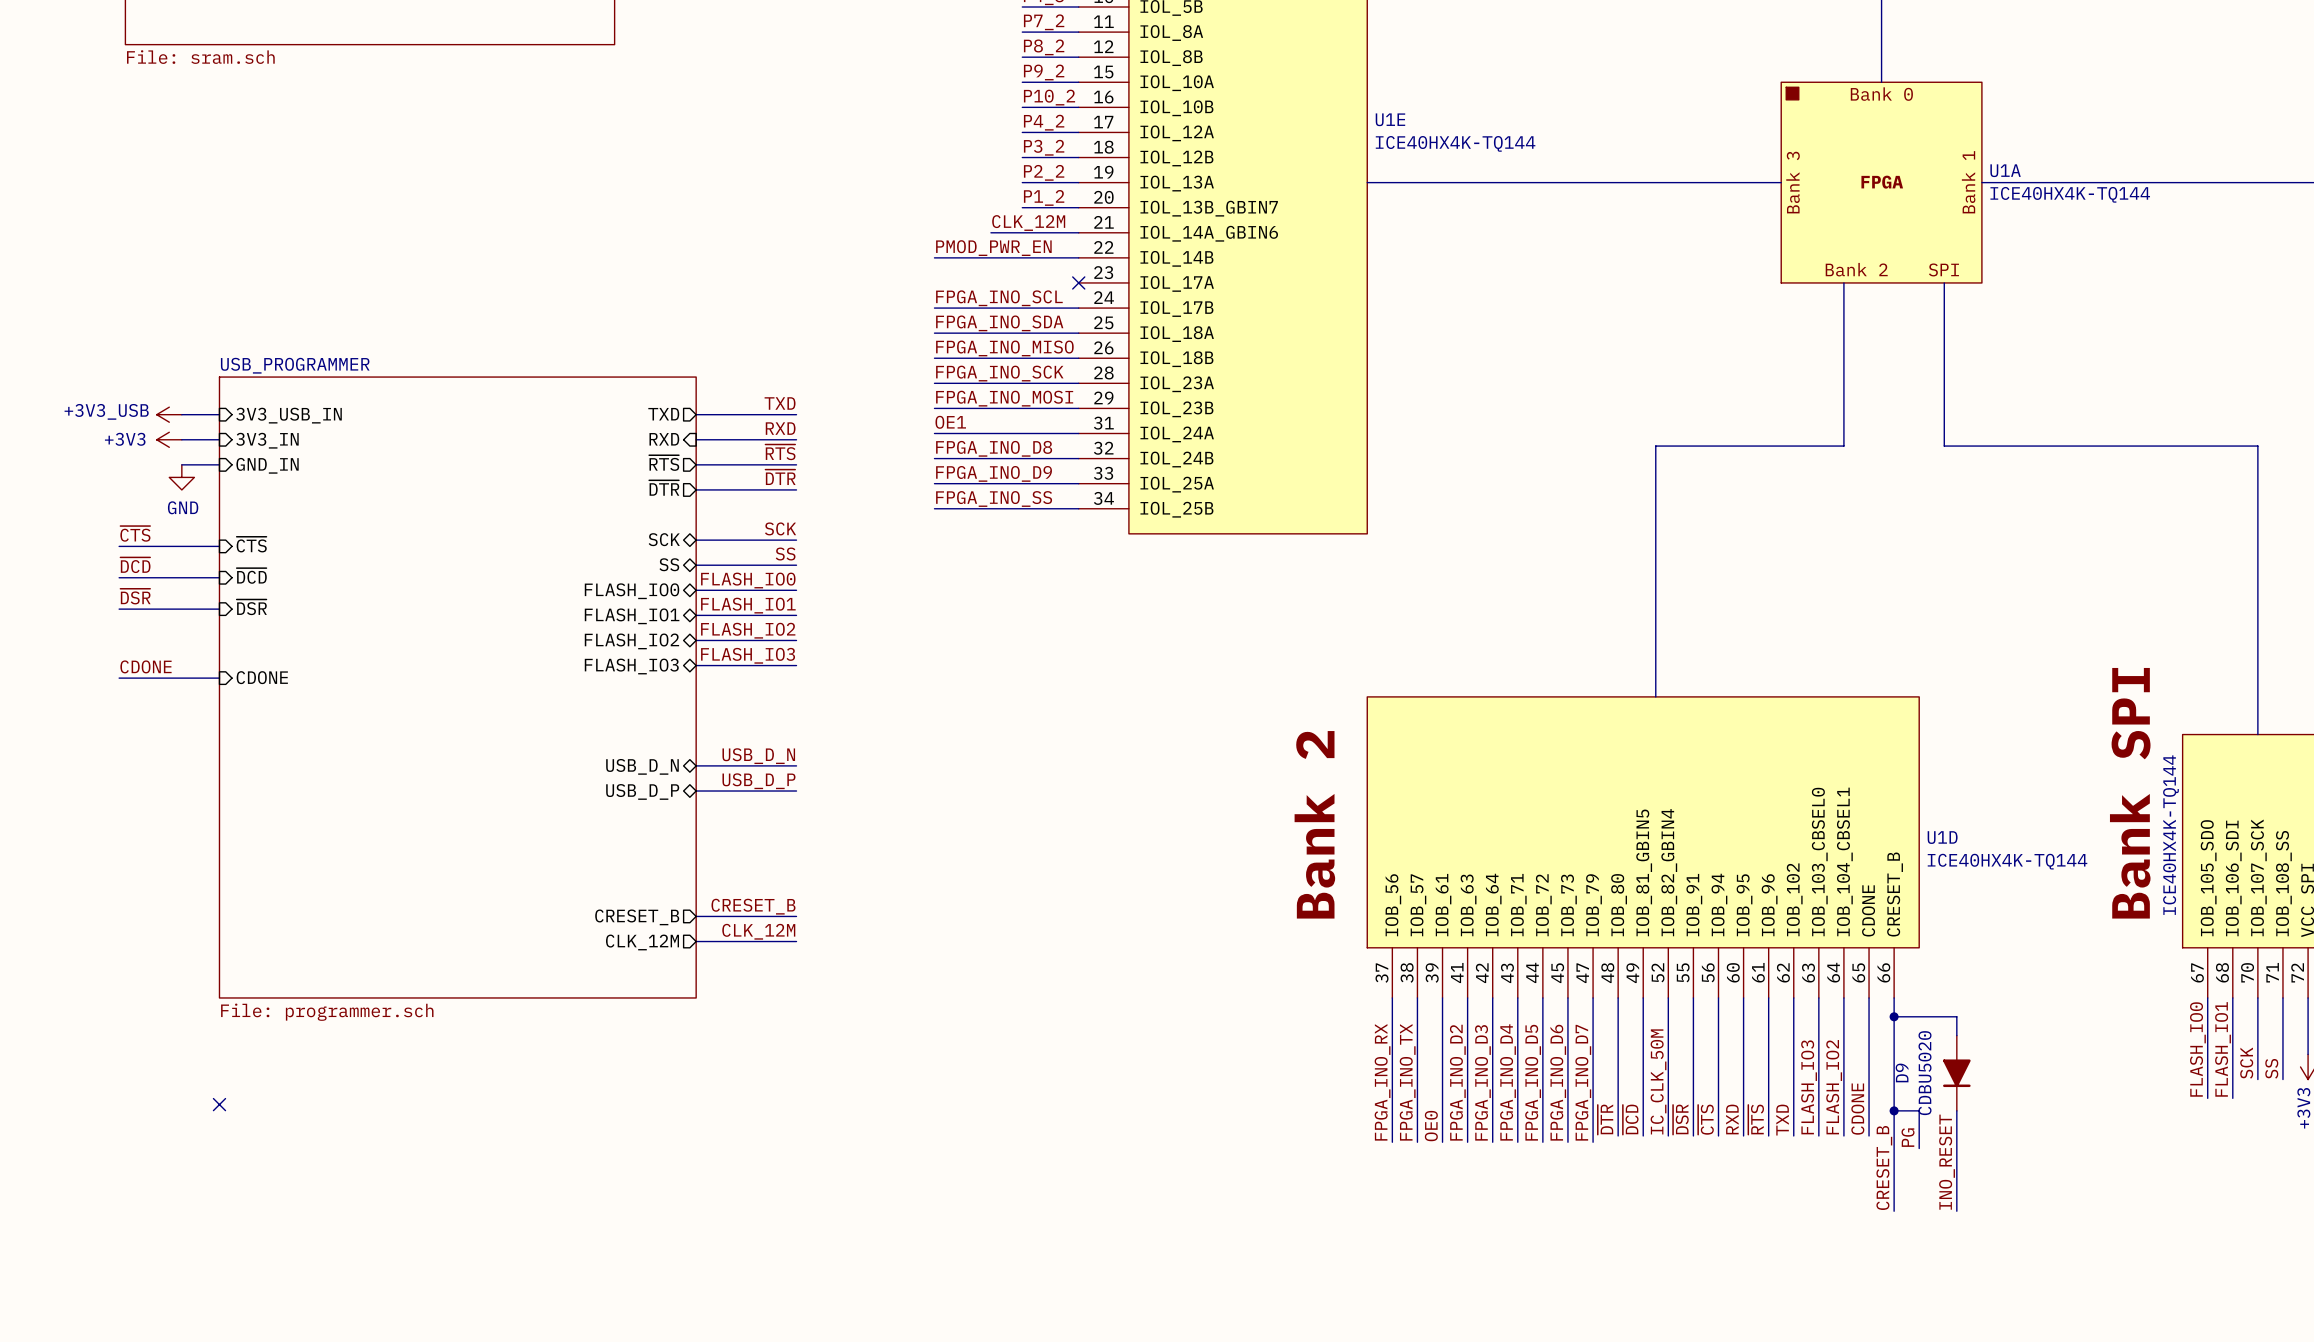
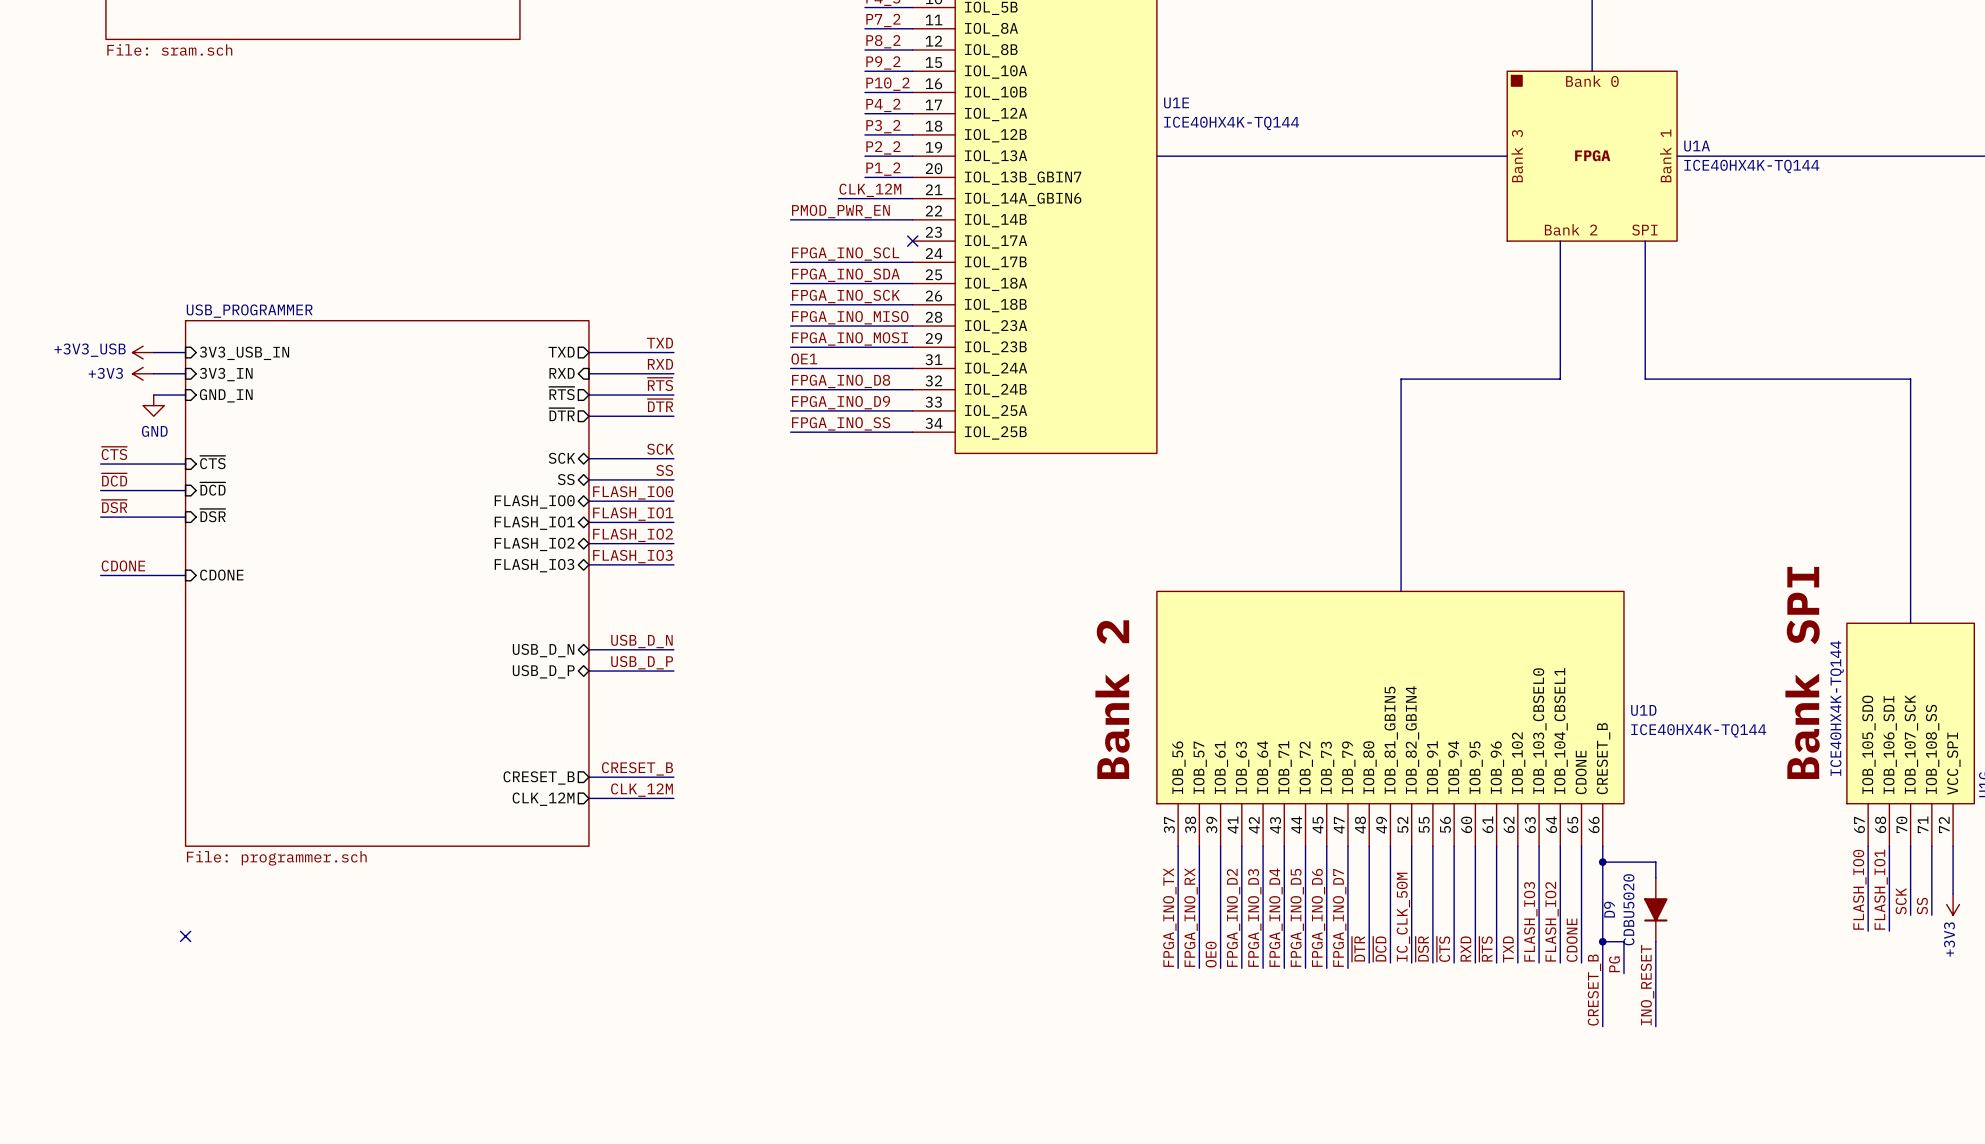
label: FPGA_INO_MISO (1004, 348) -> FPGA_INO_SCK (845, 296)
label: FPGA_INO_SCK (999, 373) -> FPGA_INO_MISO (850, 317)
label: FPGA_INO_RX (1382, 1082) -> FPGA_INO_TX (1169, 917)
label: FPGA_INO_TX (1407, 1082) -> FPGA_INO_RX (1191, 917)

